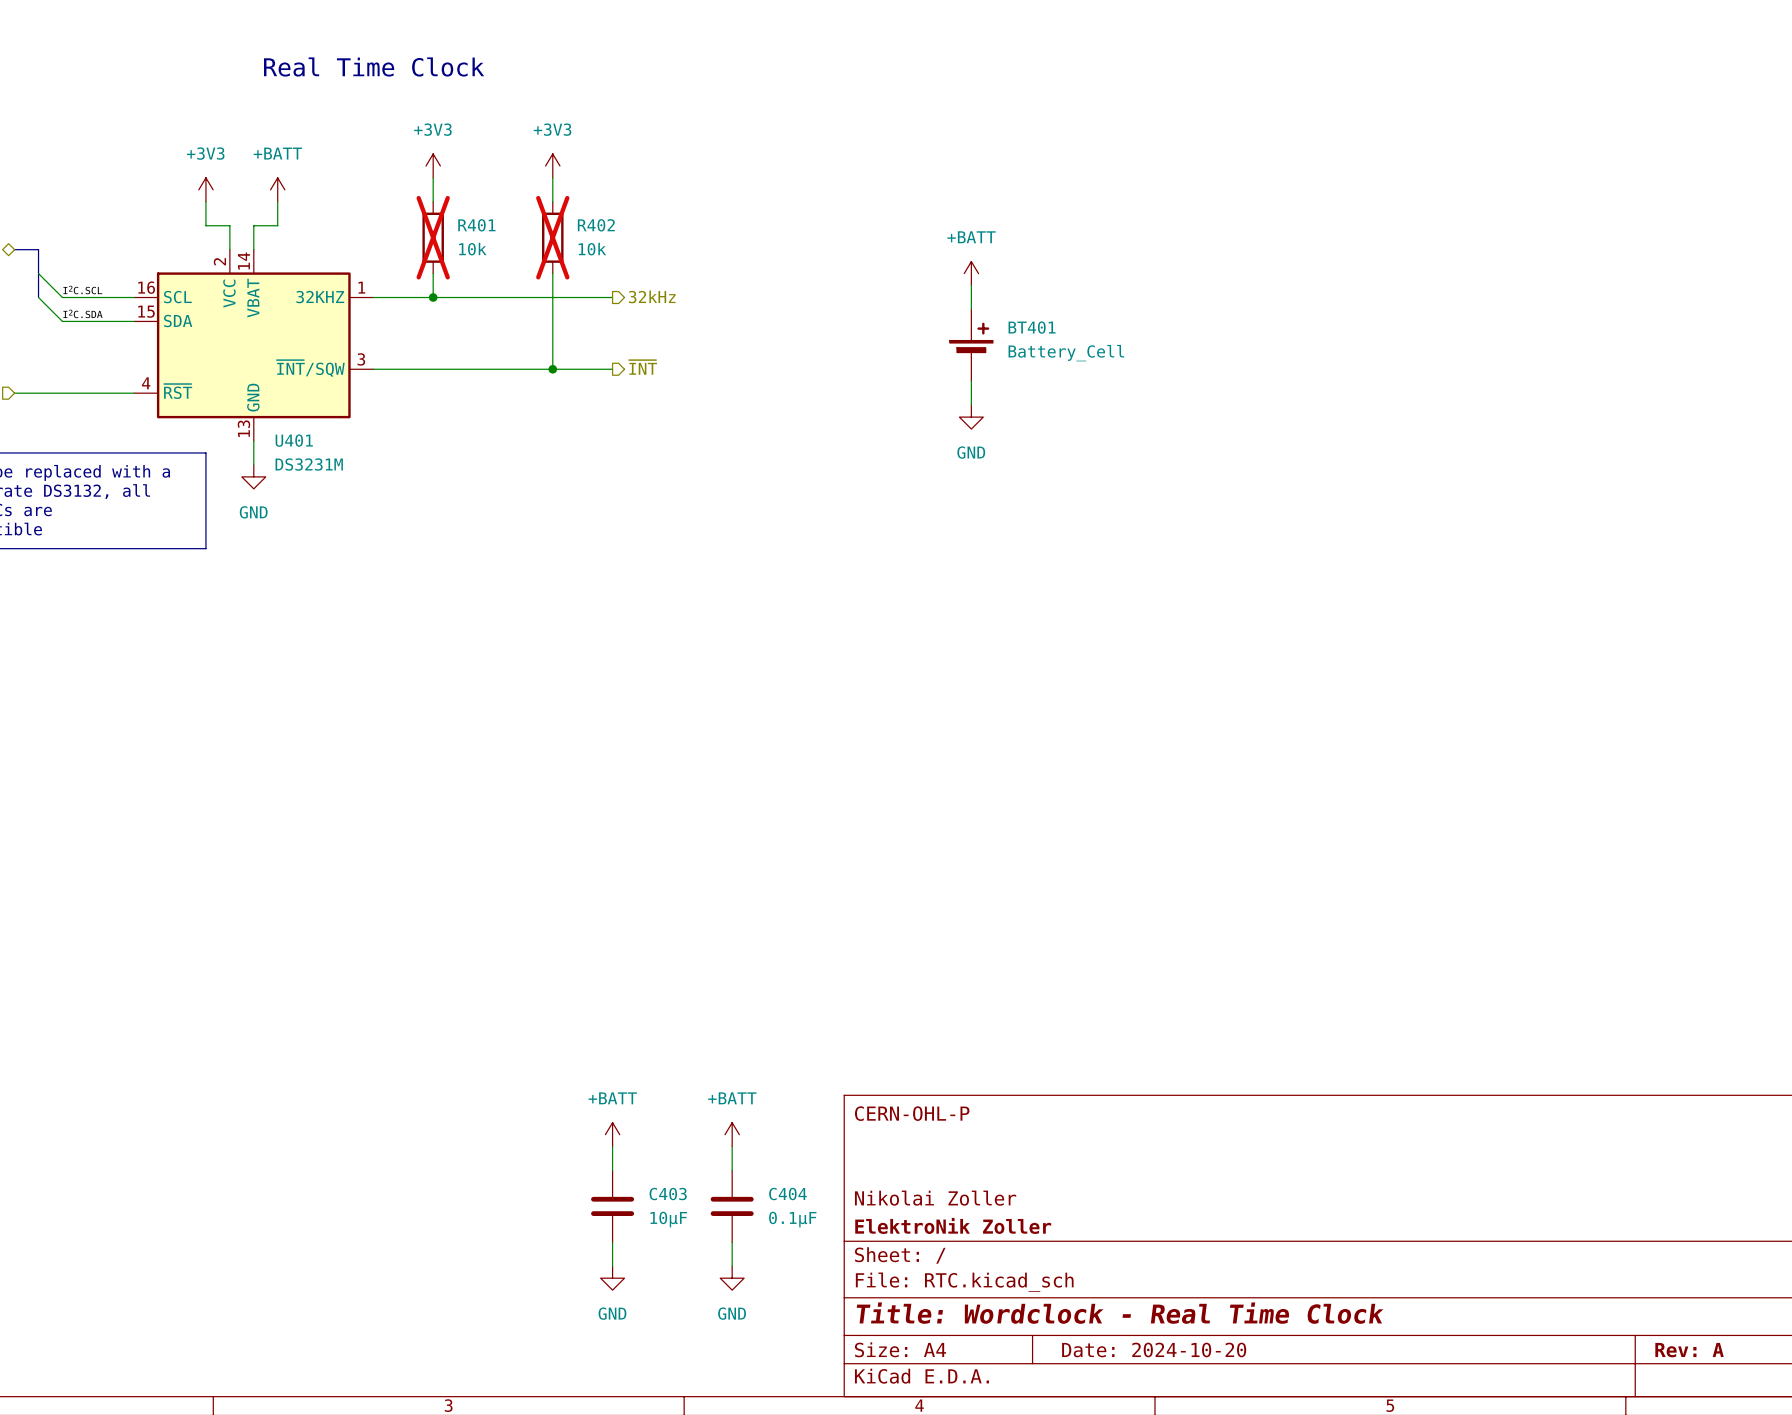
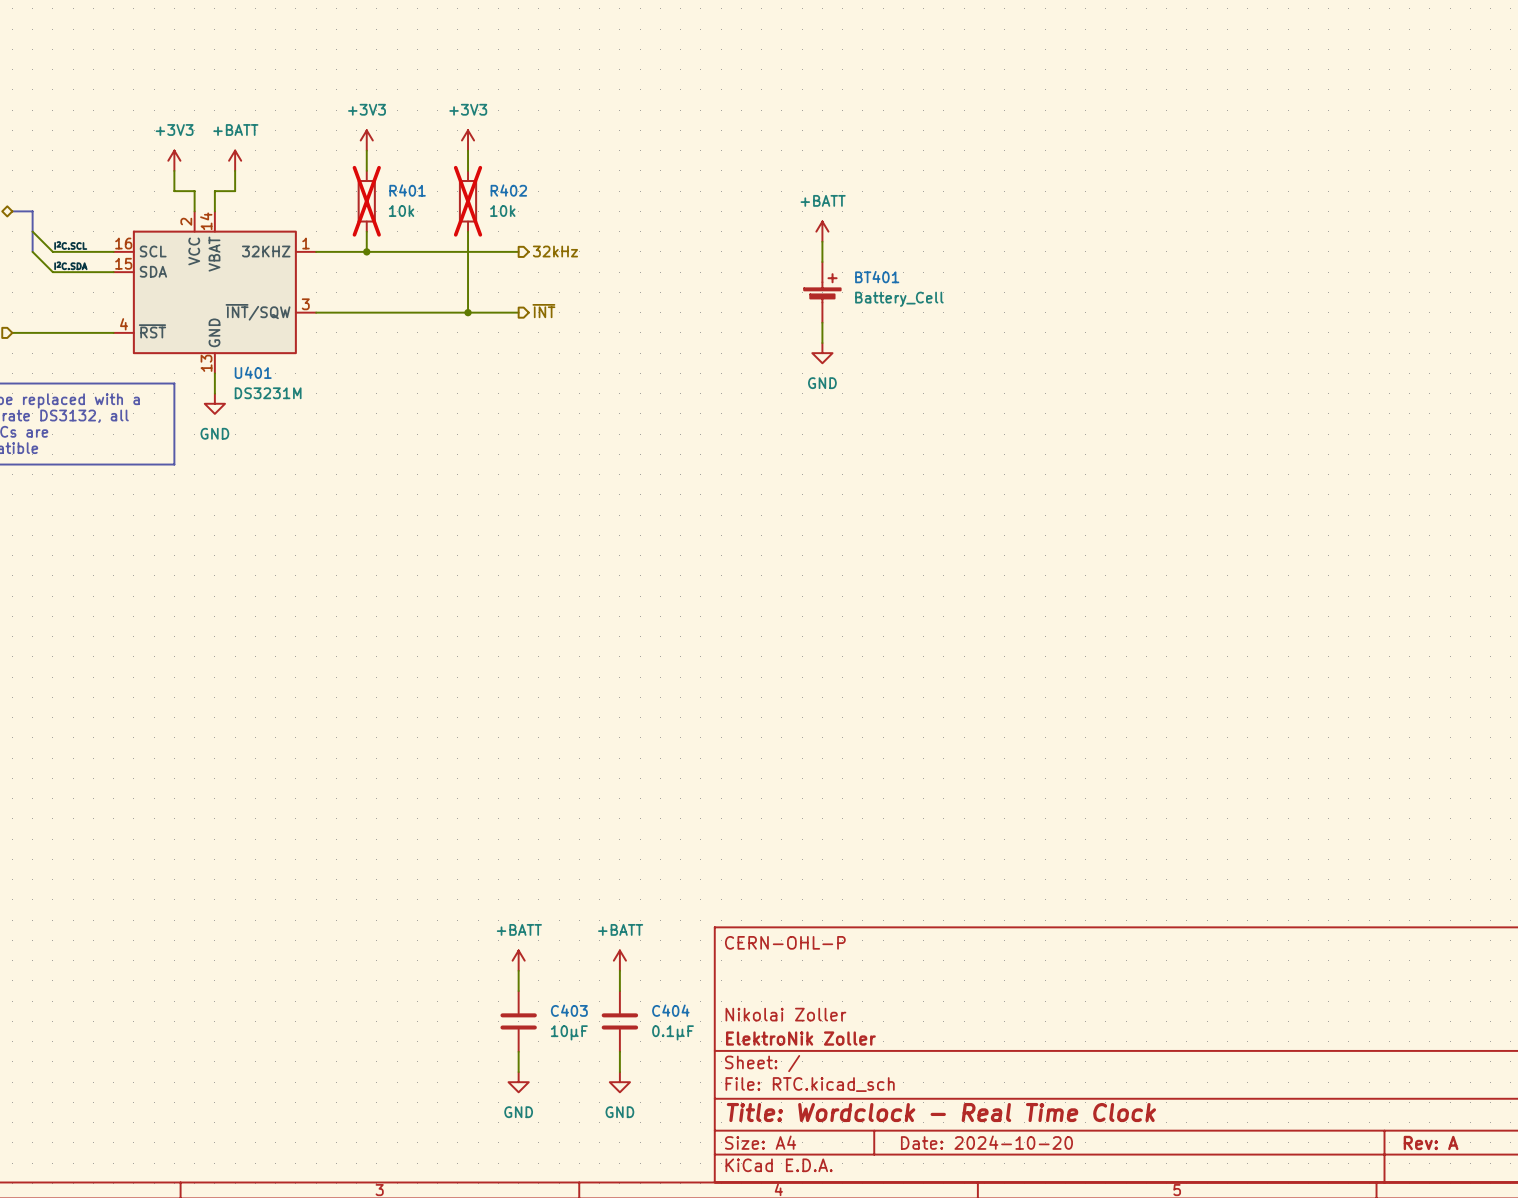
text: Real Time Clock (374, 66) -> none

